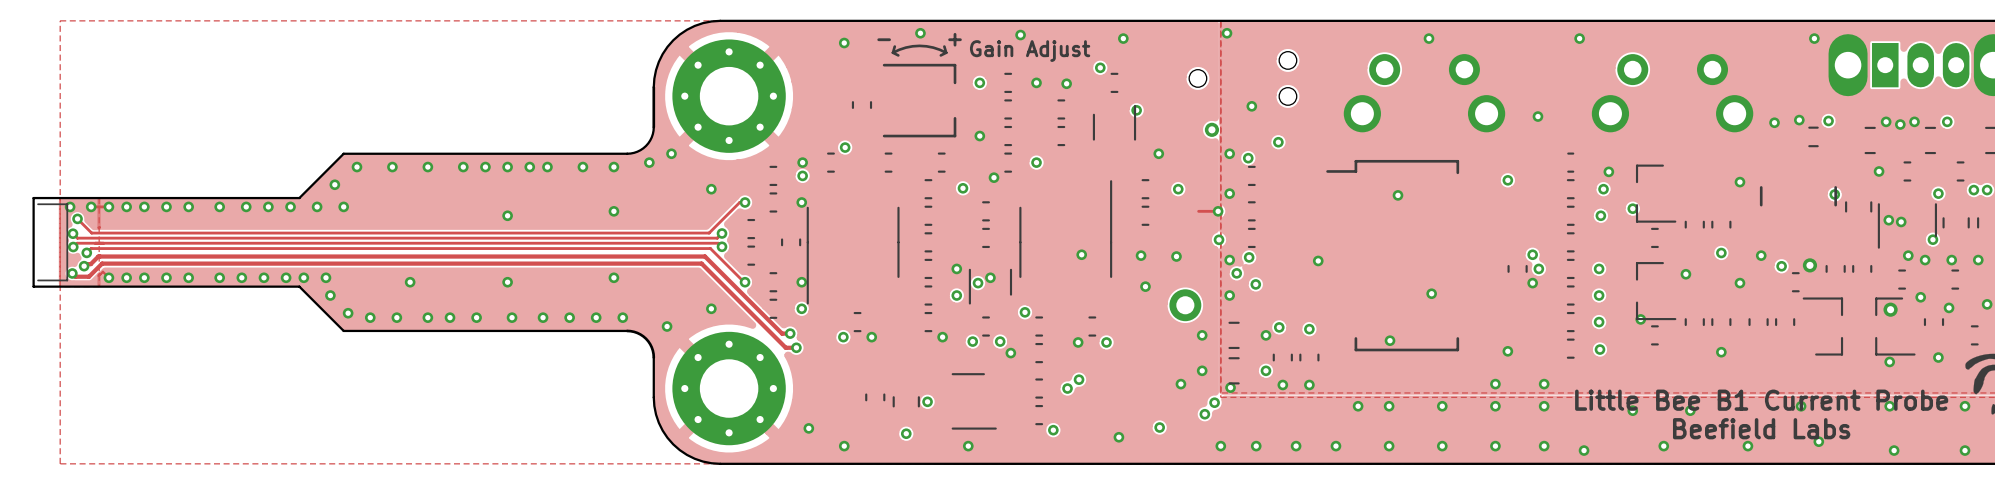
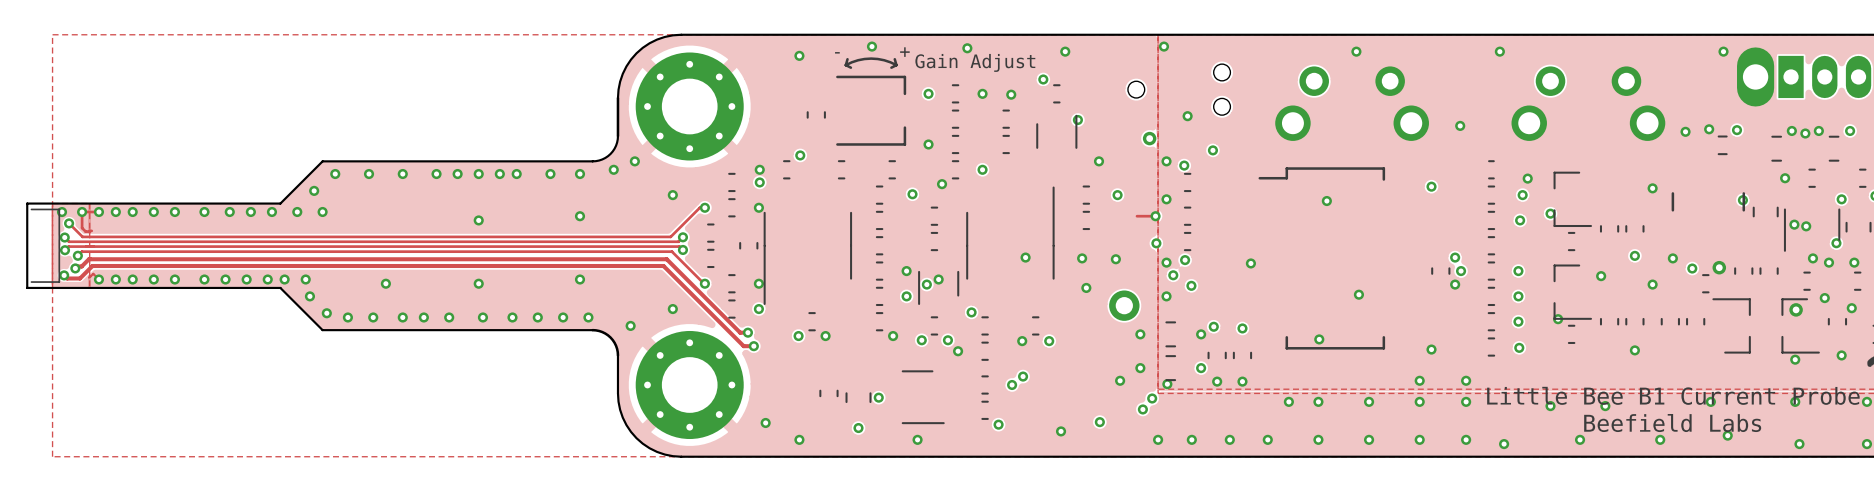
track: none -> (82, 211) (82, 228) (85, 231) (91, 230)

